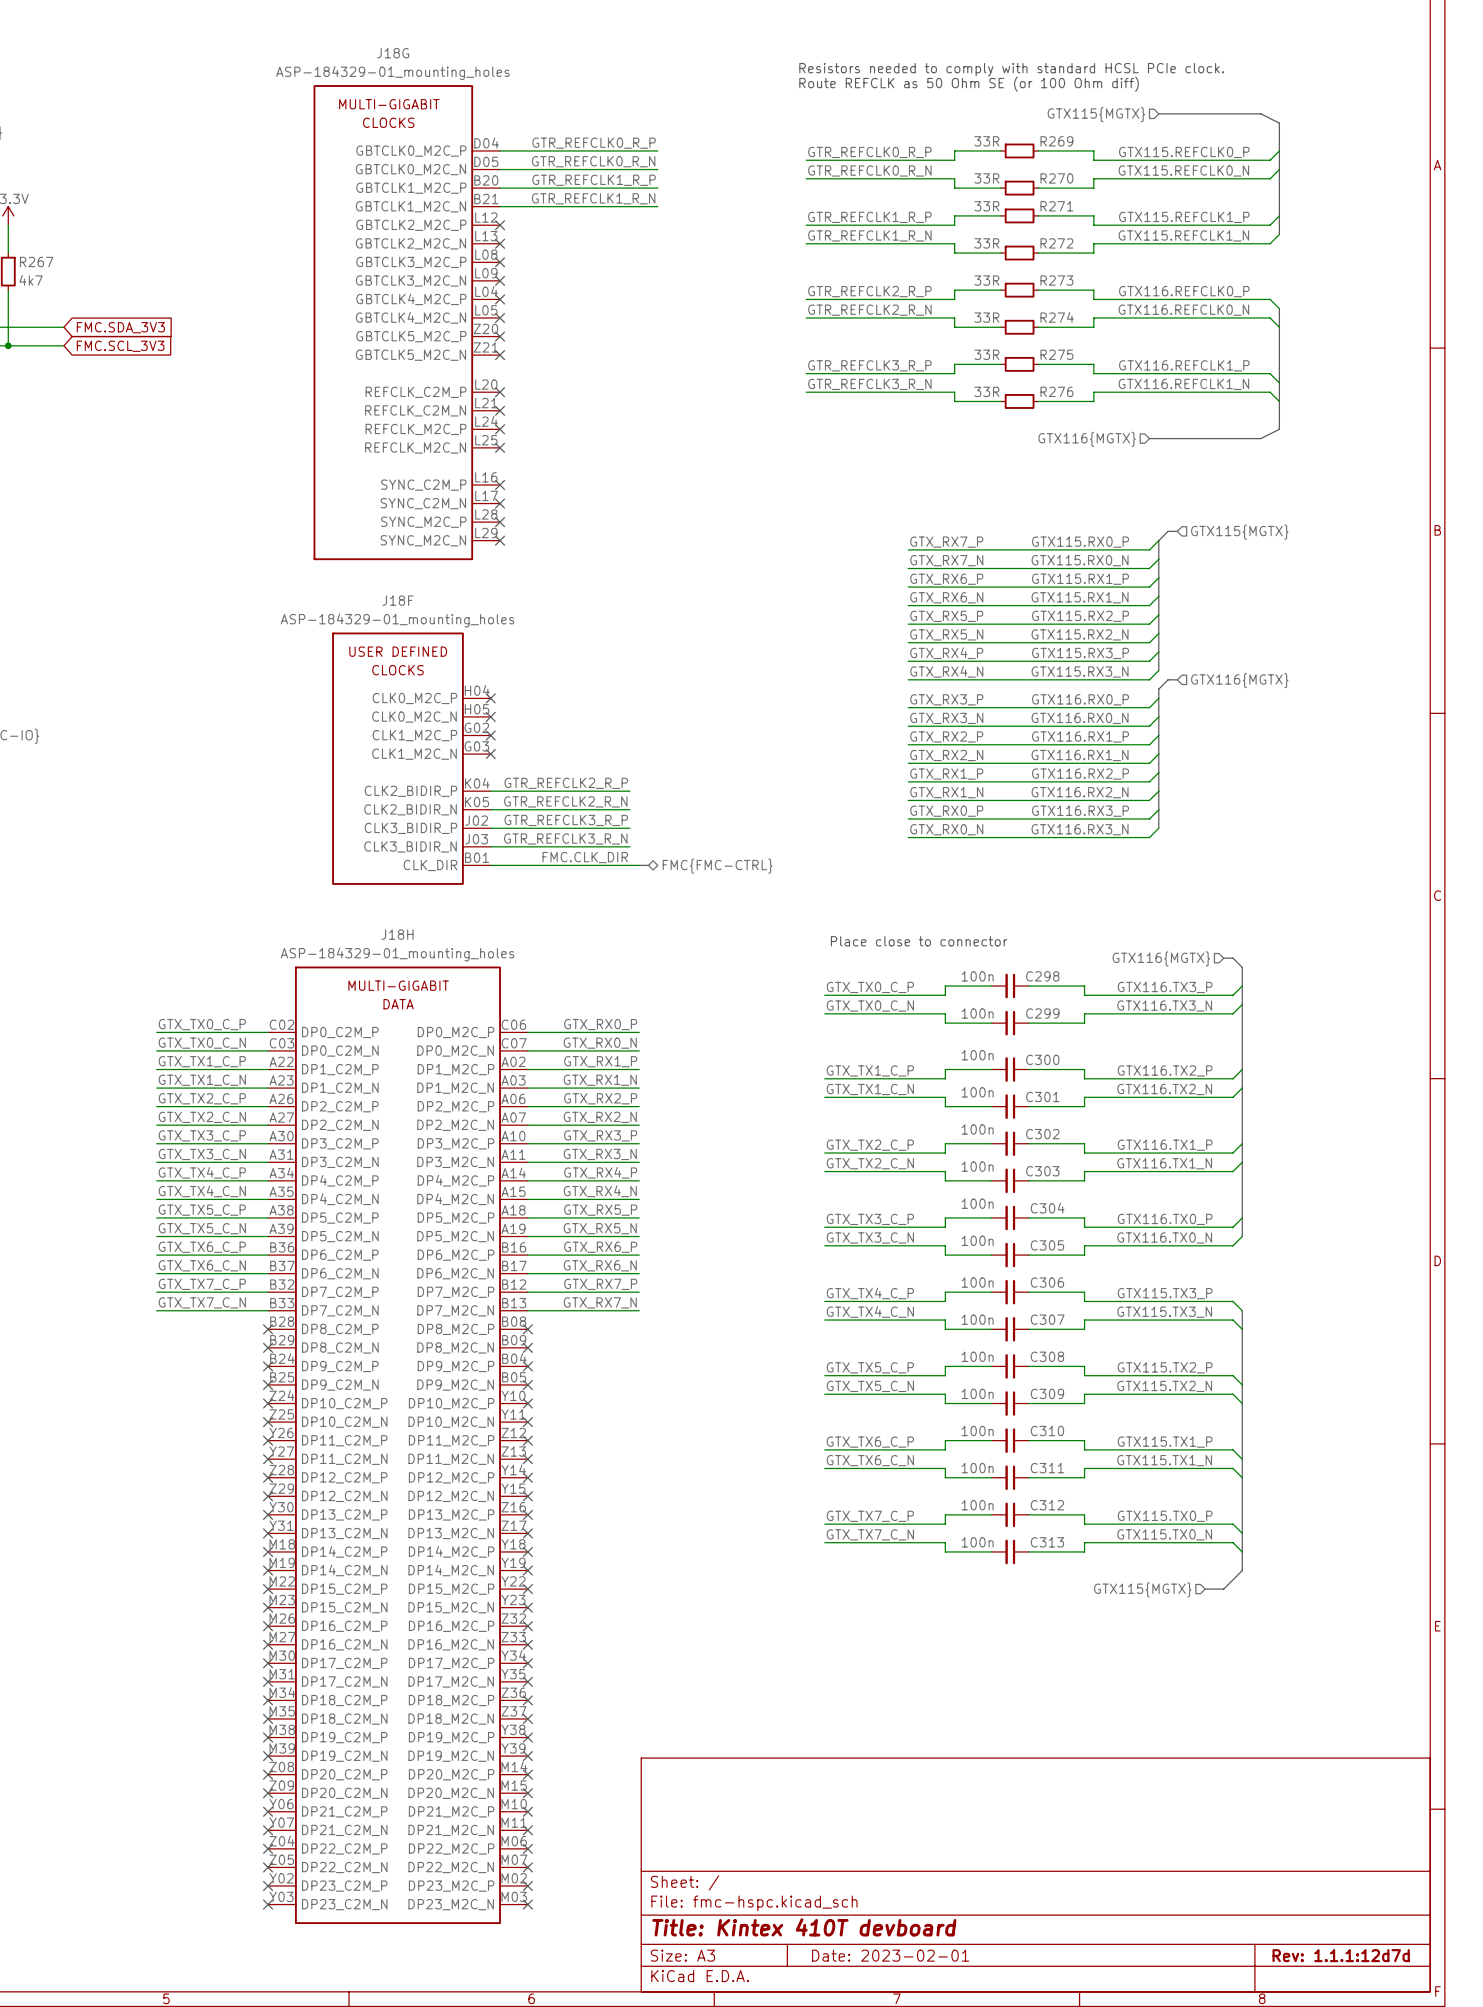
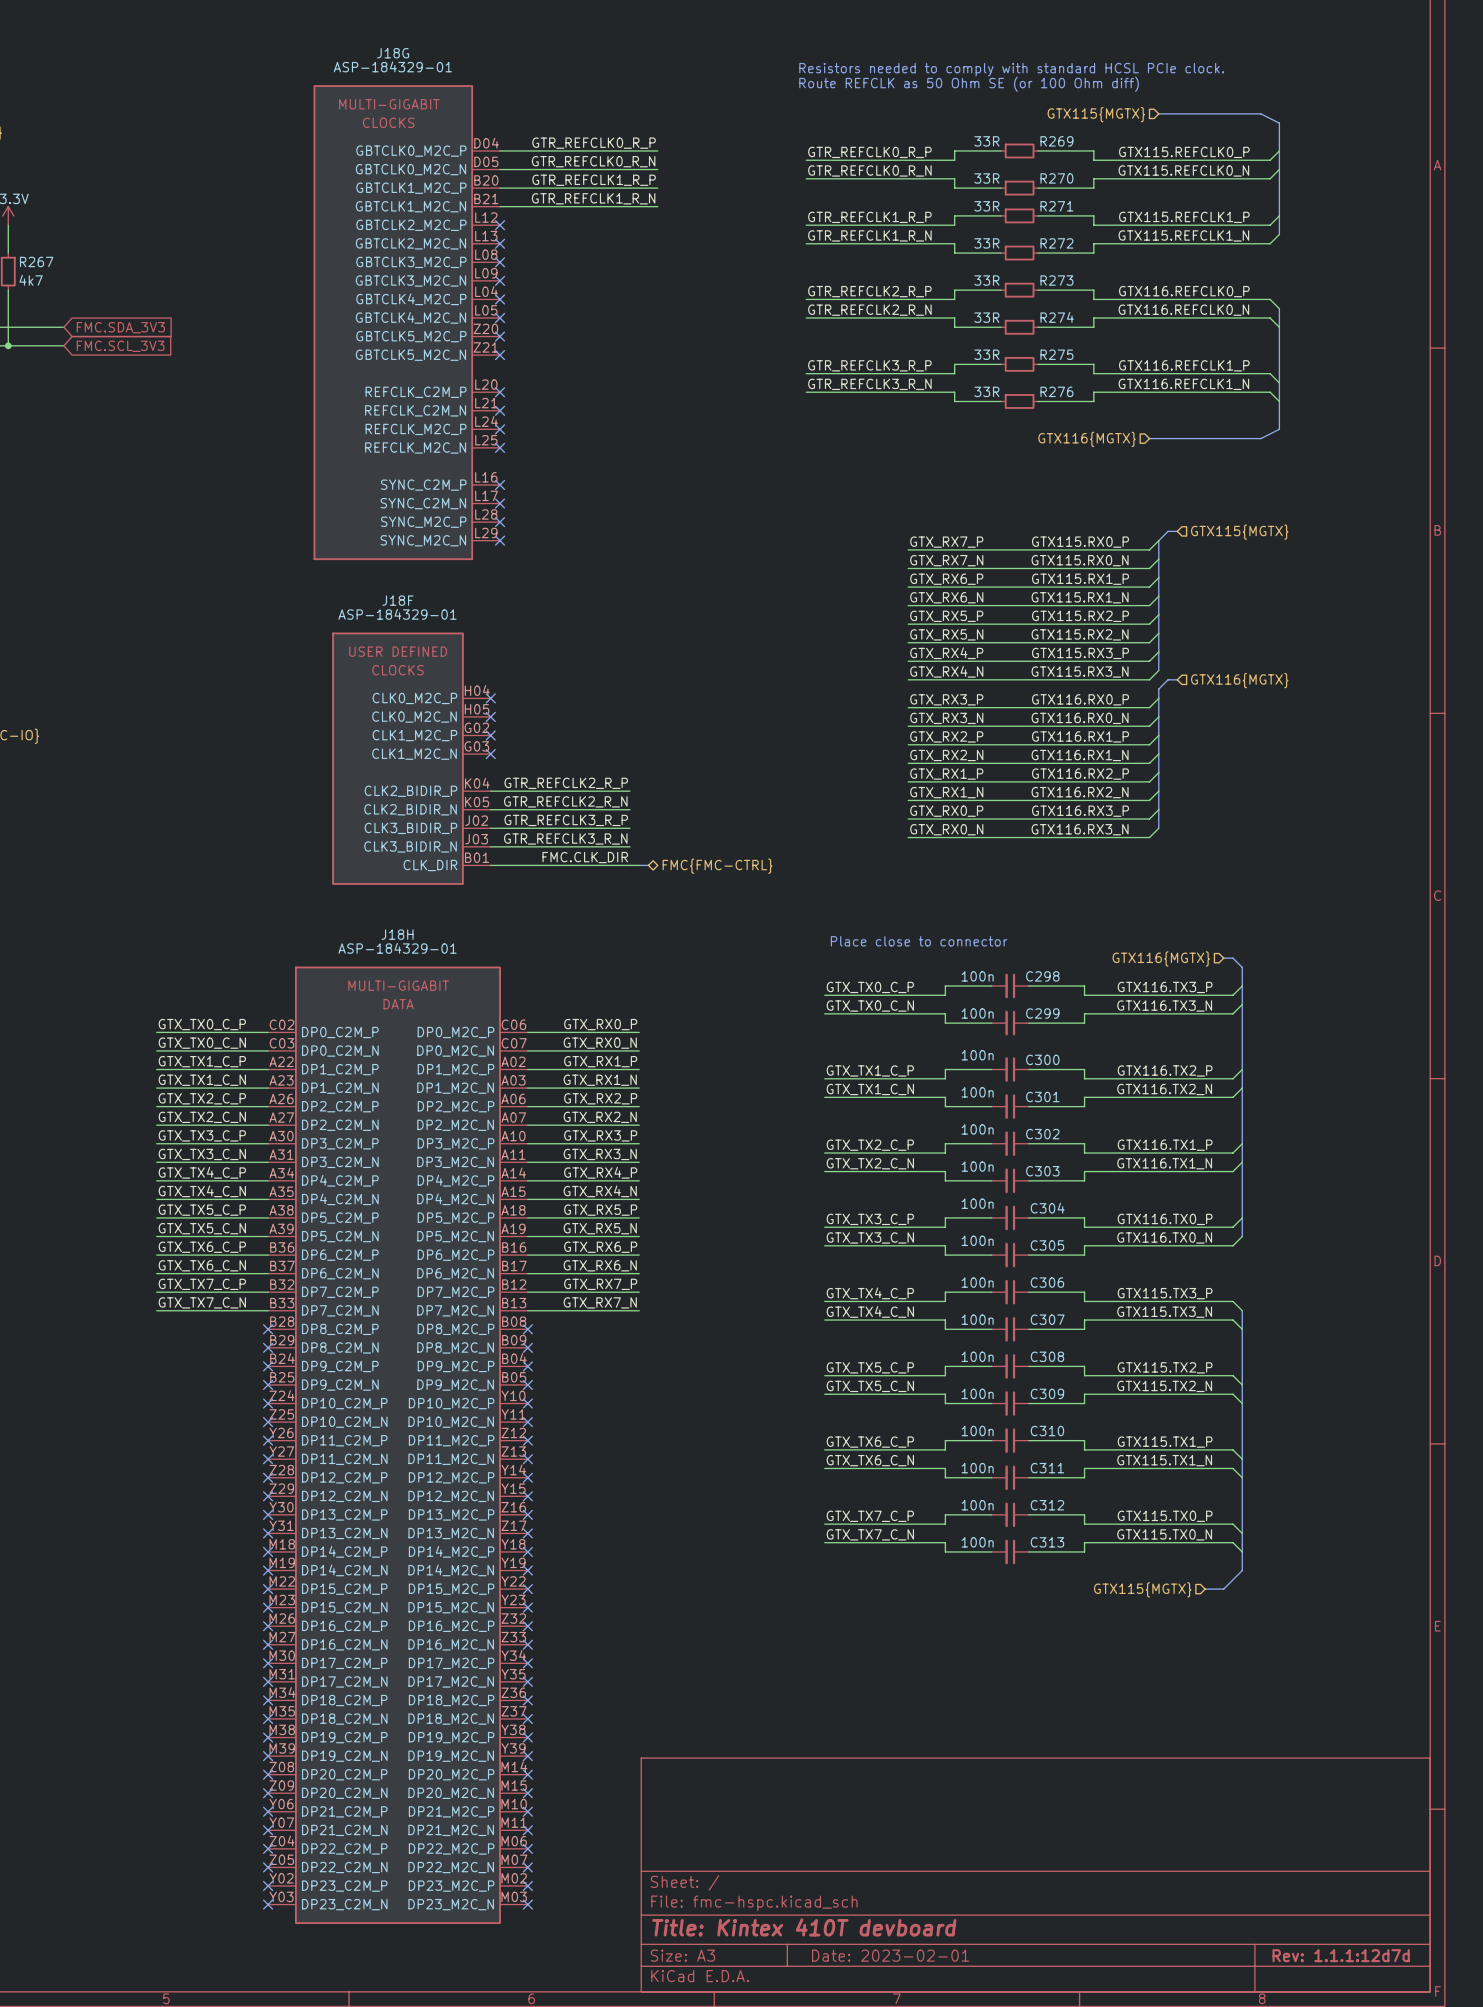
J18G text: none -> ASP-184329-01 (392, 66)
J18G value: ASP-184329-01_mounting_holes (392, 73) -> none
J18F text: none -> ASP-184329-01 (397, 614)
J18F value: ASP-184329-01_mounting_holes (397, 620) -> none
J18H text: none -> ASP-184329-01 (397, 948)
J18H value: ASP-184329-01_mounting_holes (397, 954) -> none

